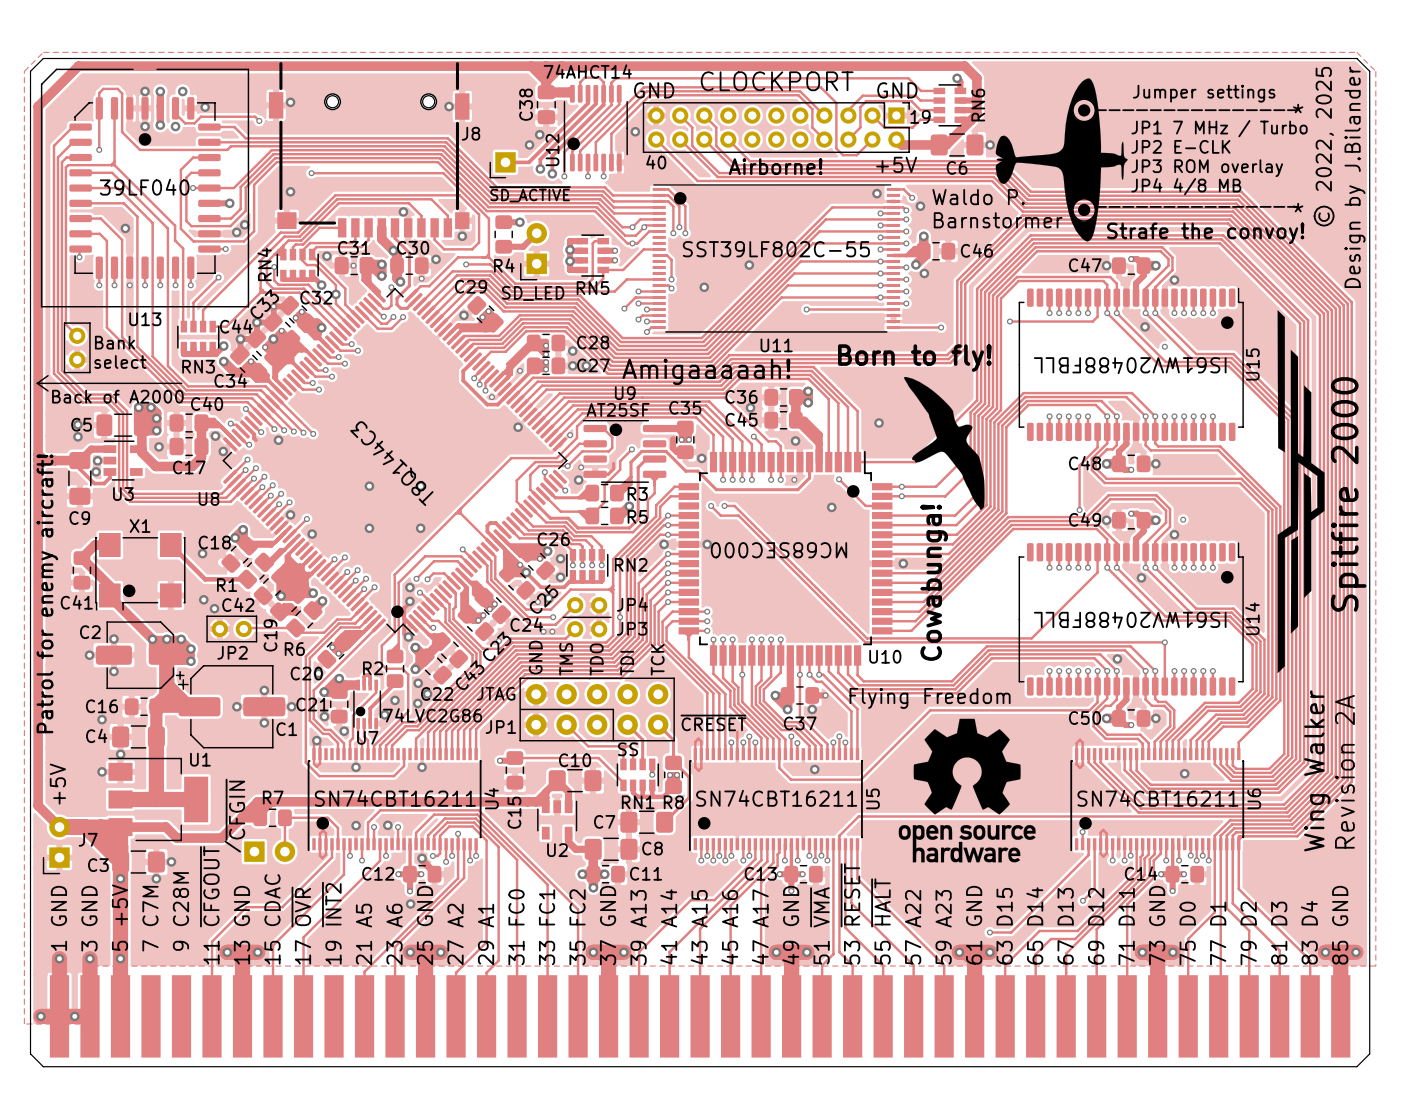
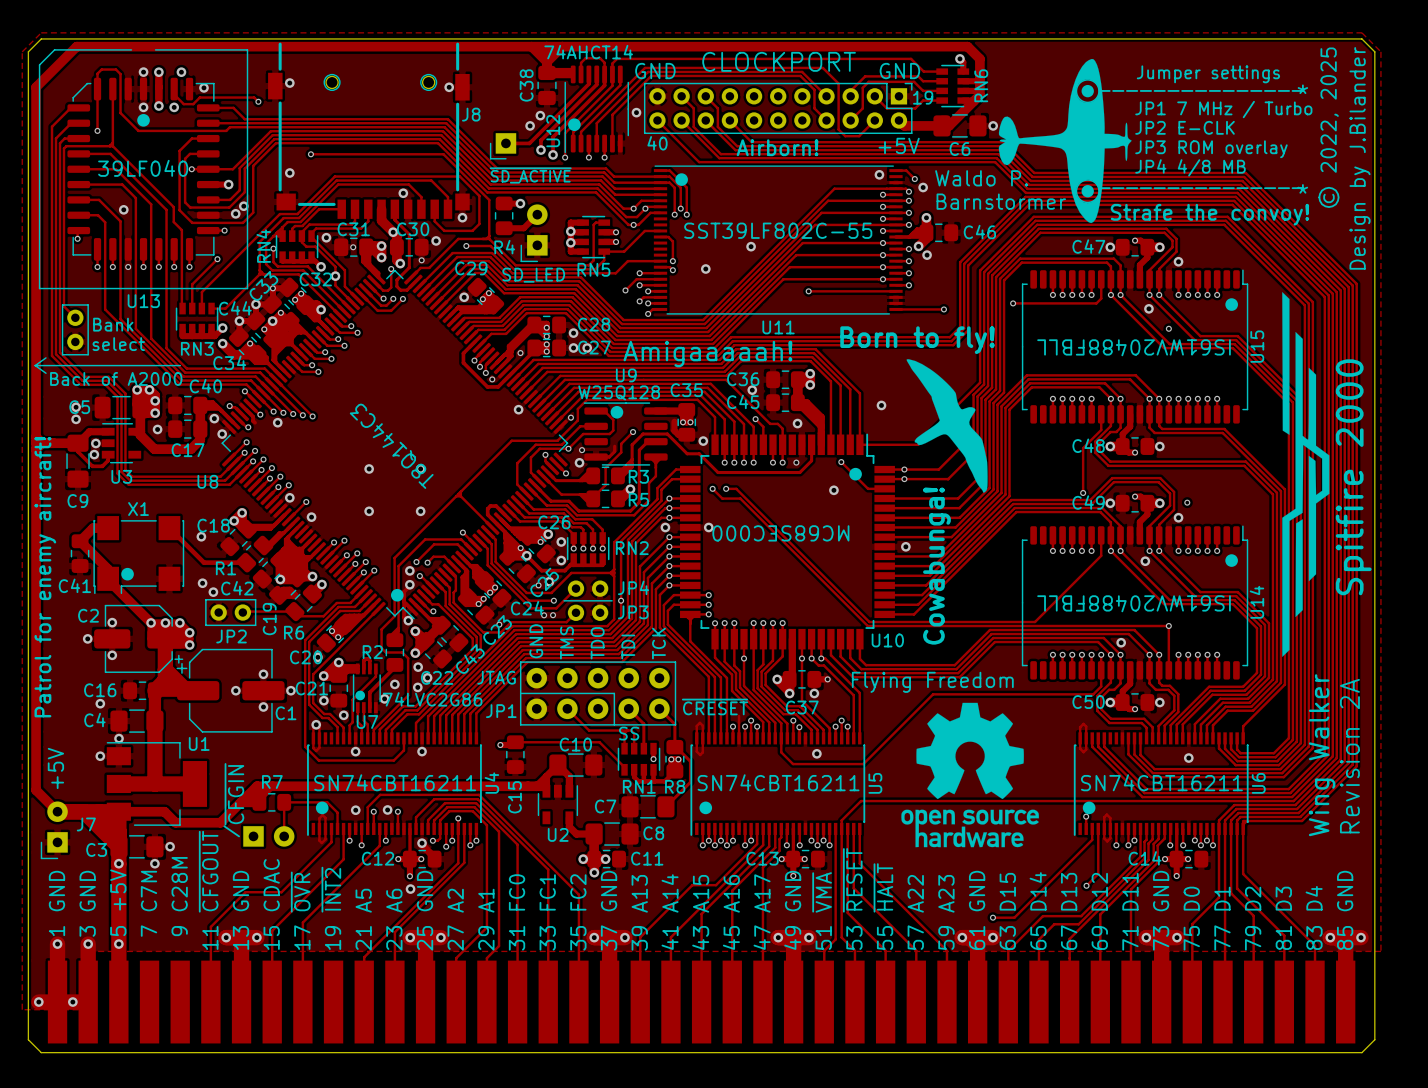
text: Airborne! (775, 166) -> Airborn! (777, 147)
text: AT25SF (618, 409) -> W25Q128 (619, 392)

